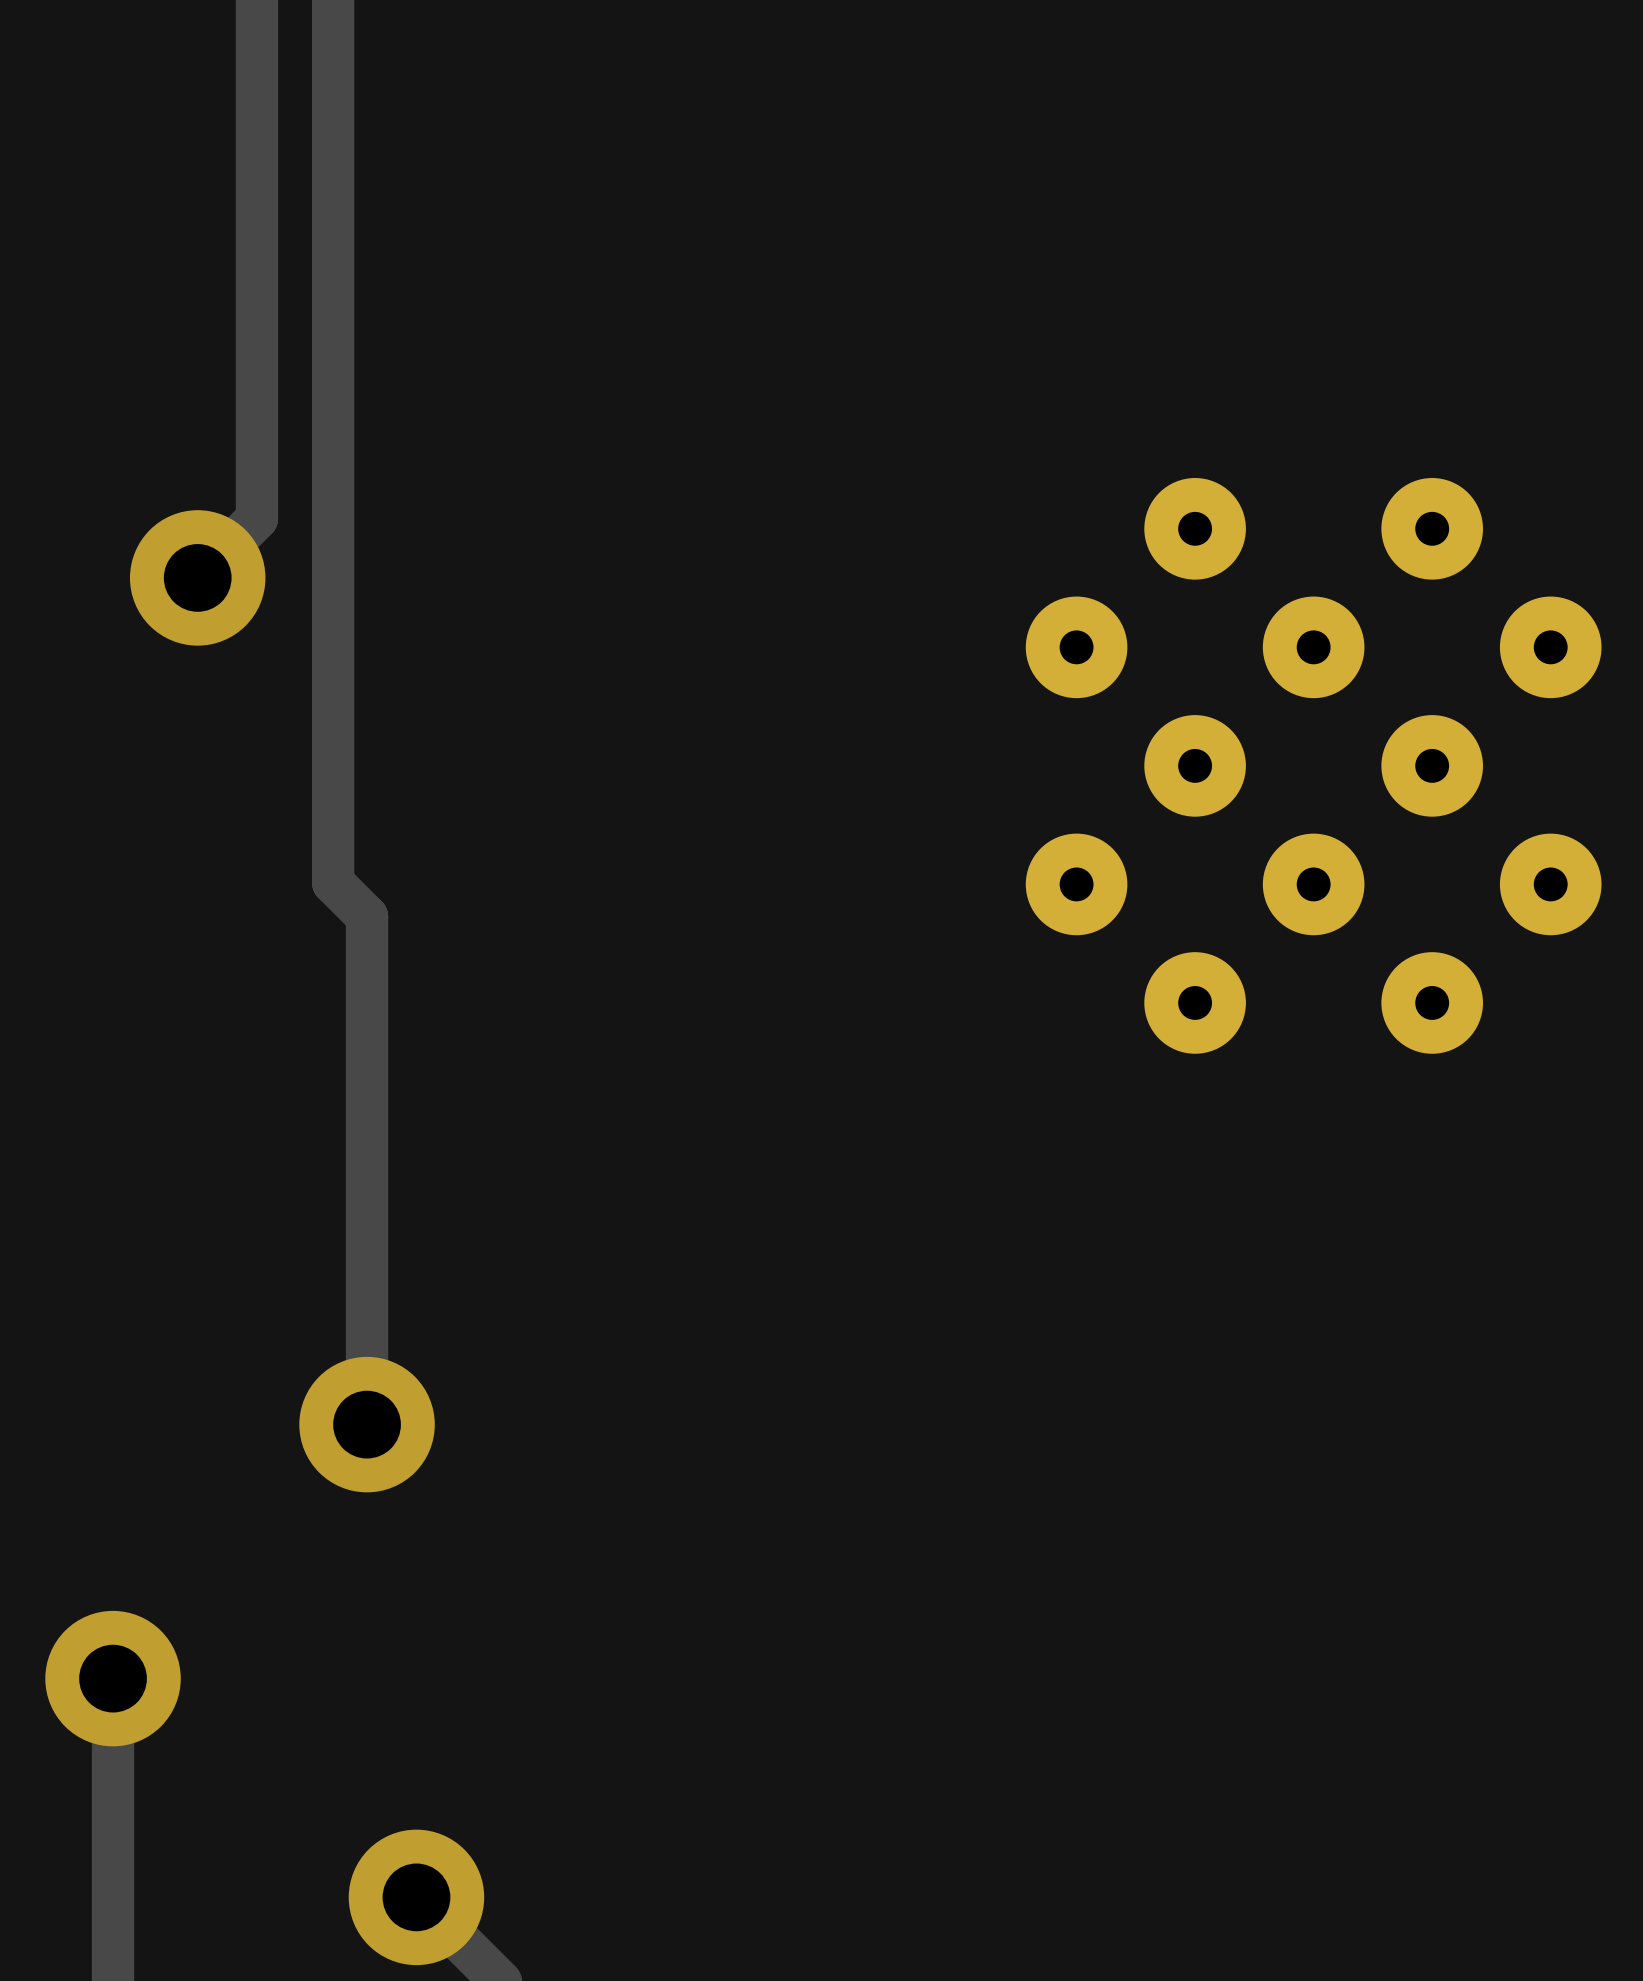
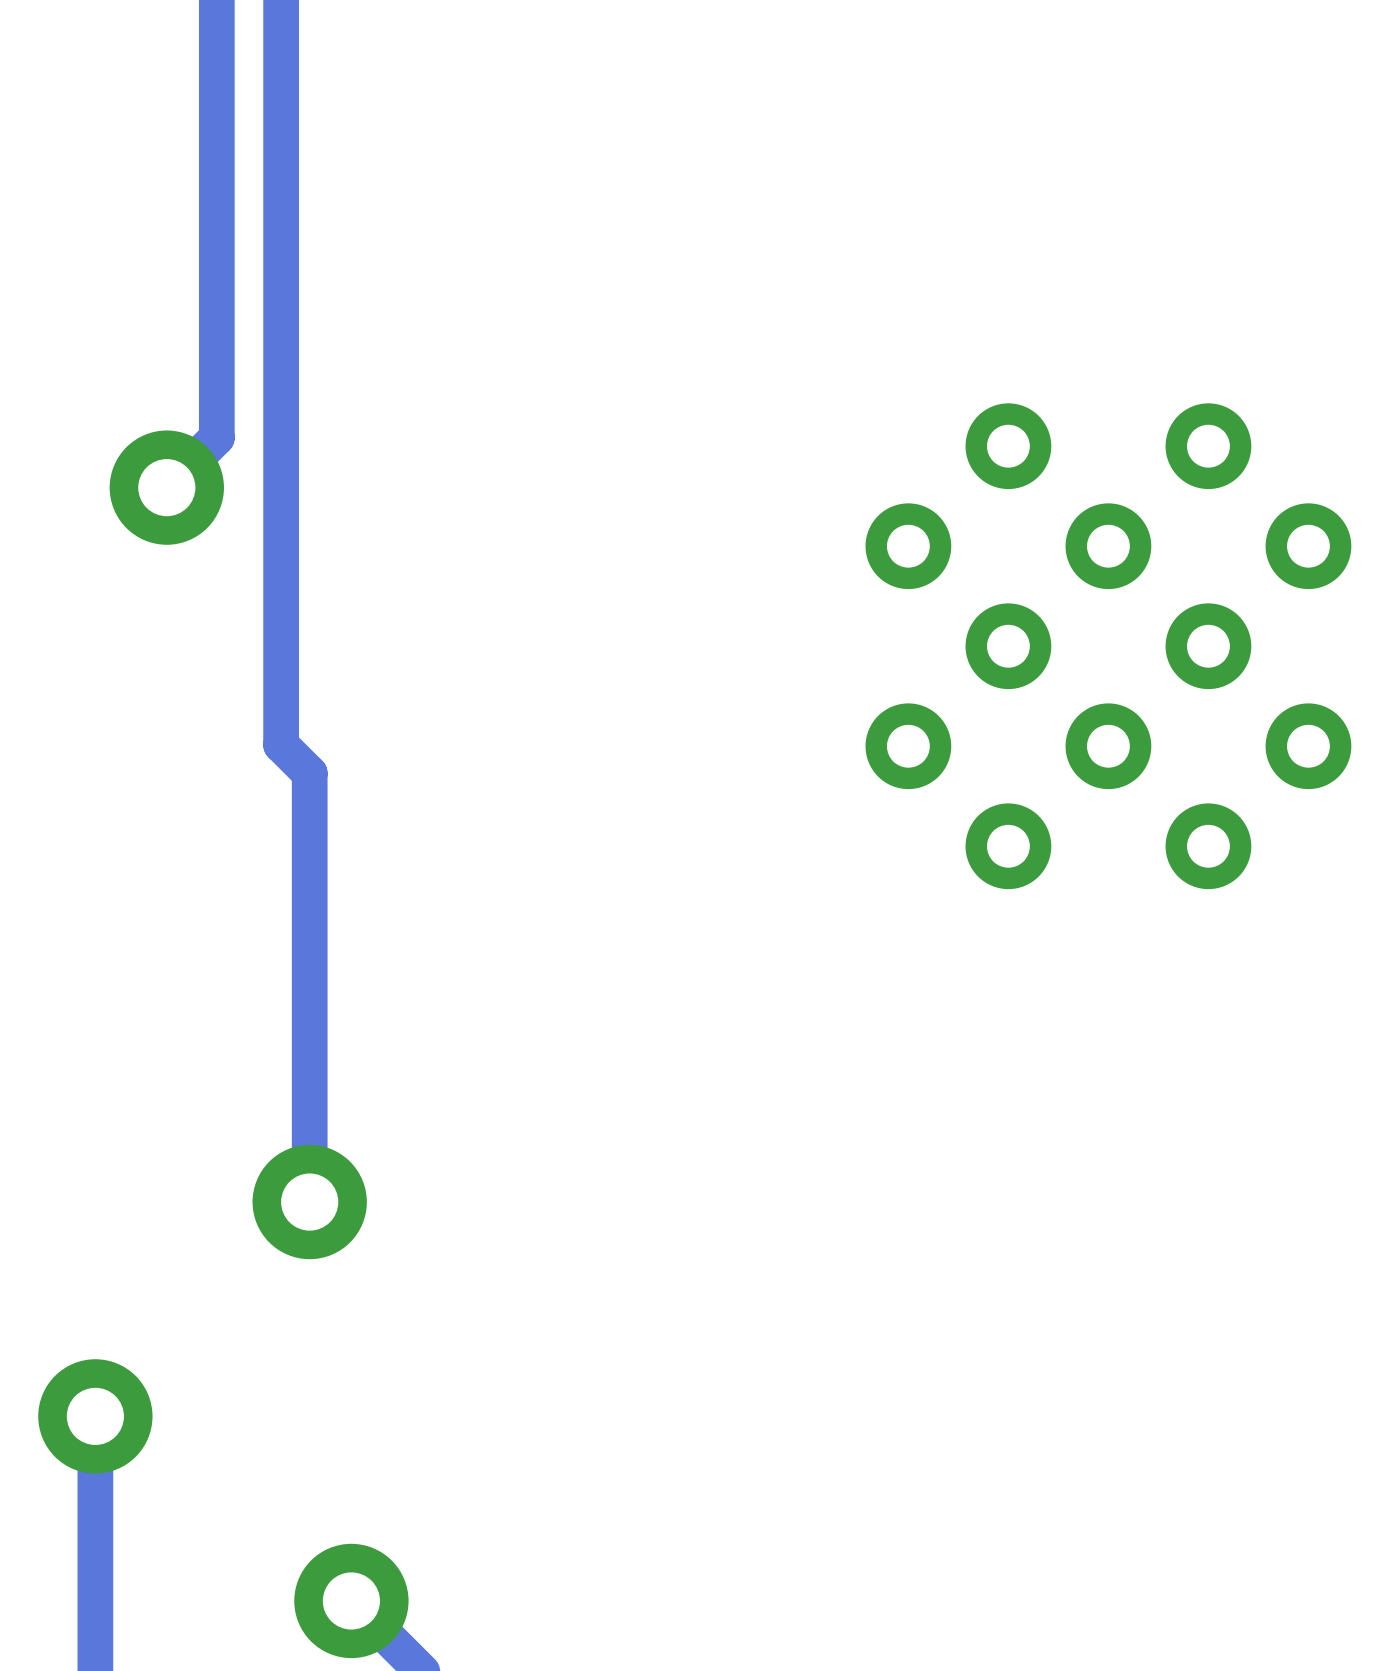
part footprint: [1025, 478, 1602, 1054] -> [865, 403, 1352, 890]

